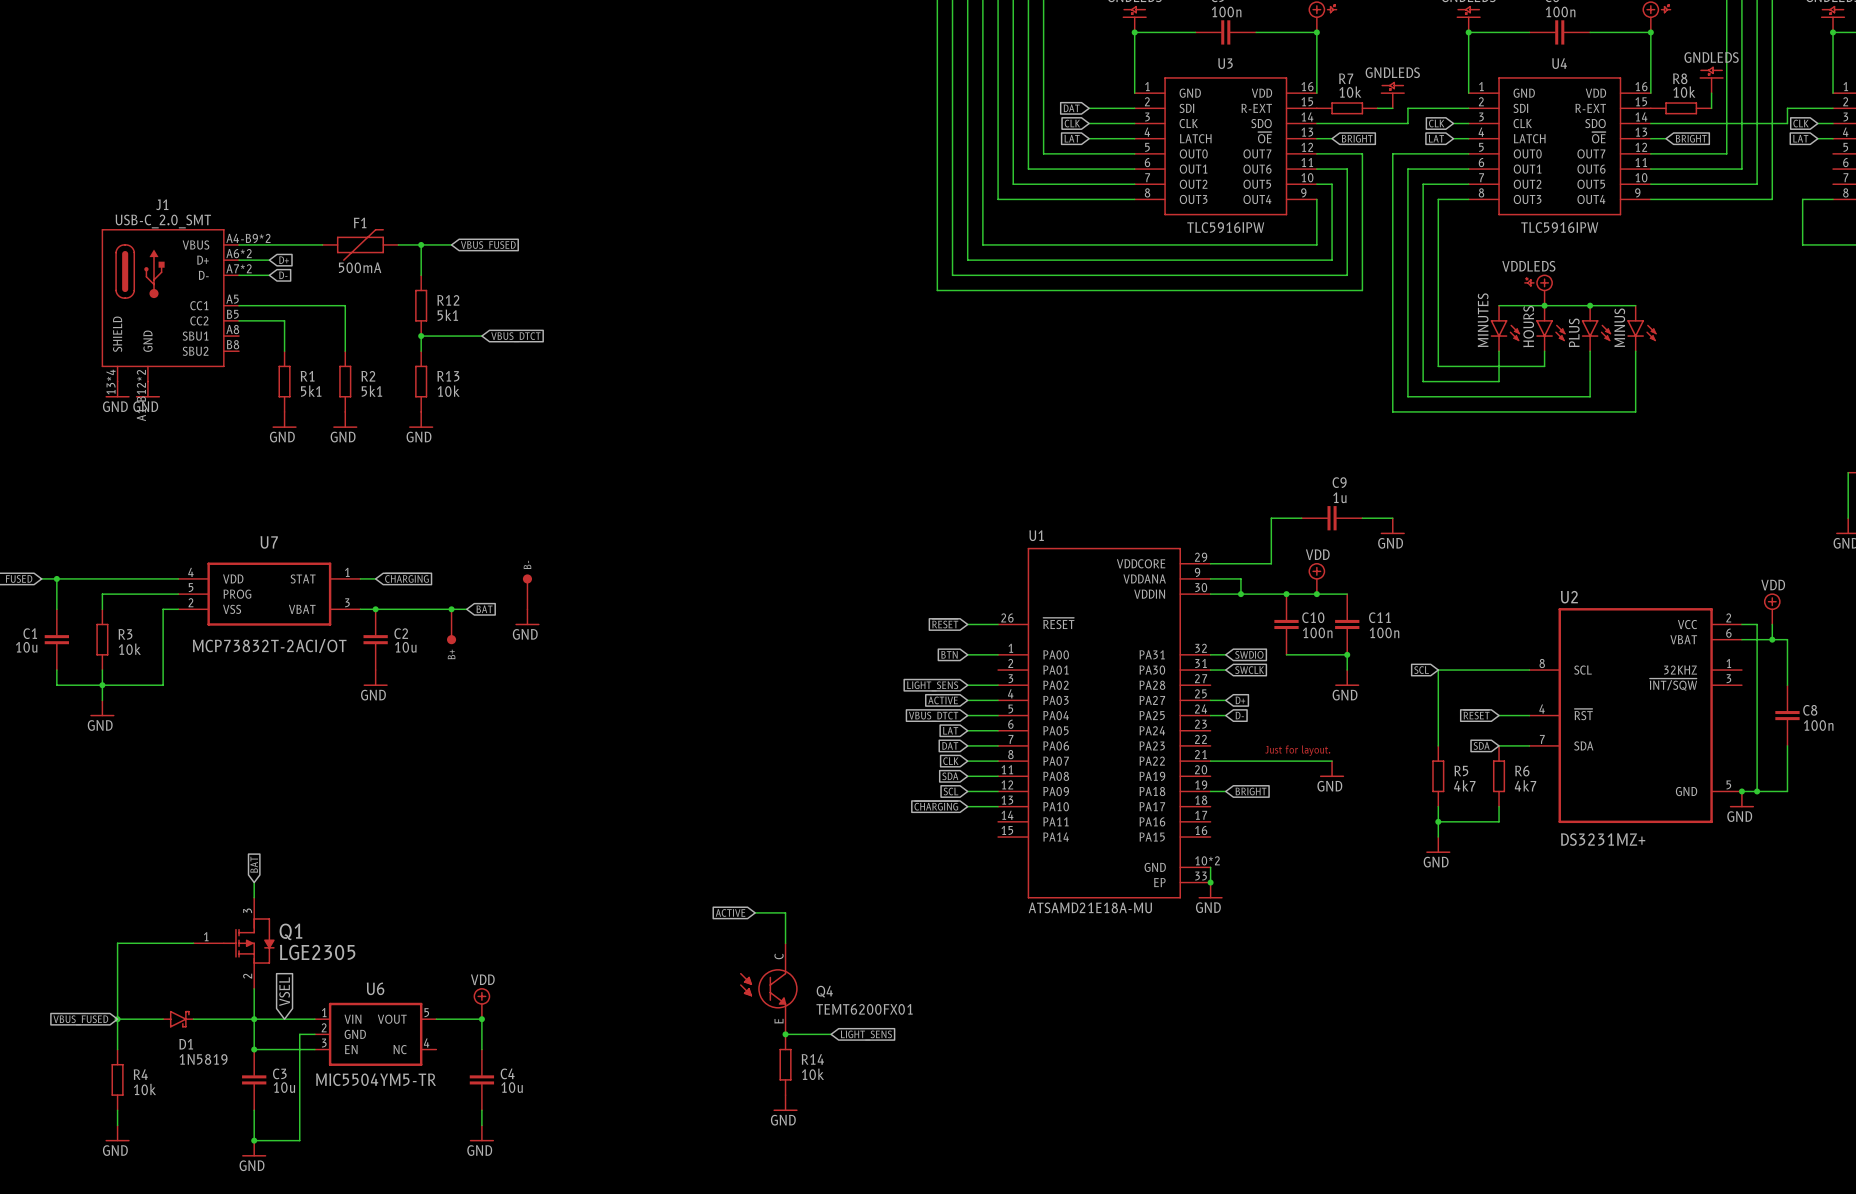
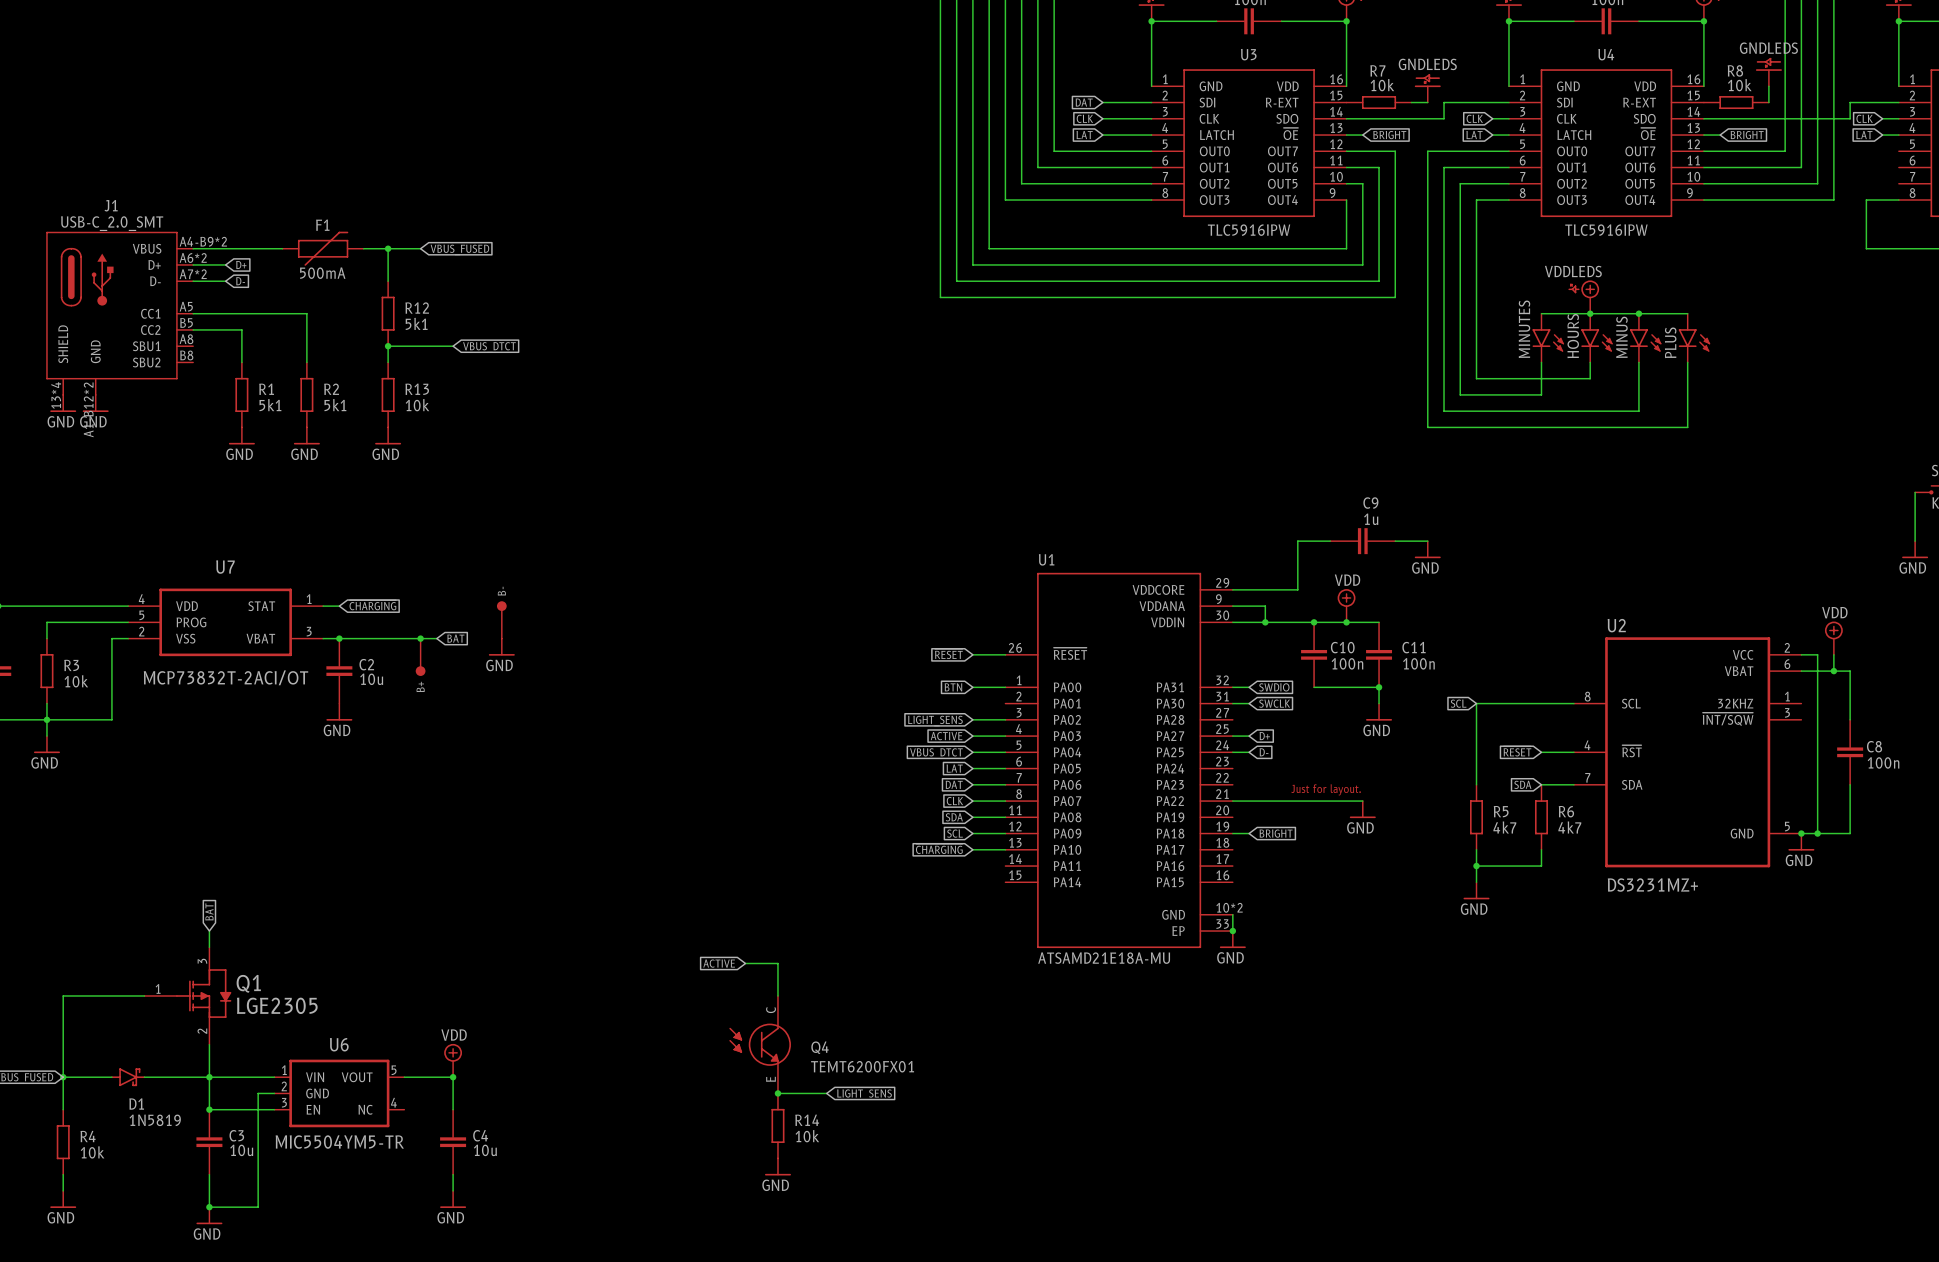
MINUS name: MINUS (1619, 327) -> PLUS (1670, 342)
PLUS name: PLUS (1574, 332) -> MINUS (1621, 337)
global label: VSEL (284, 991) -> none

